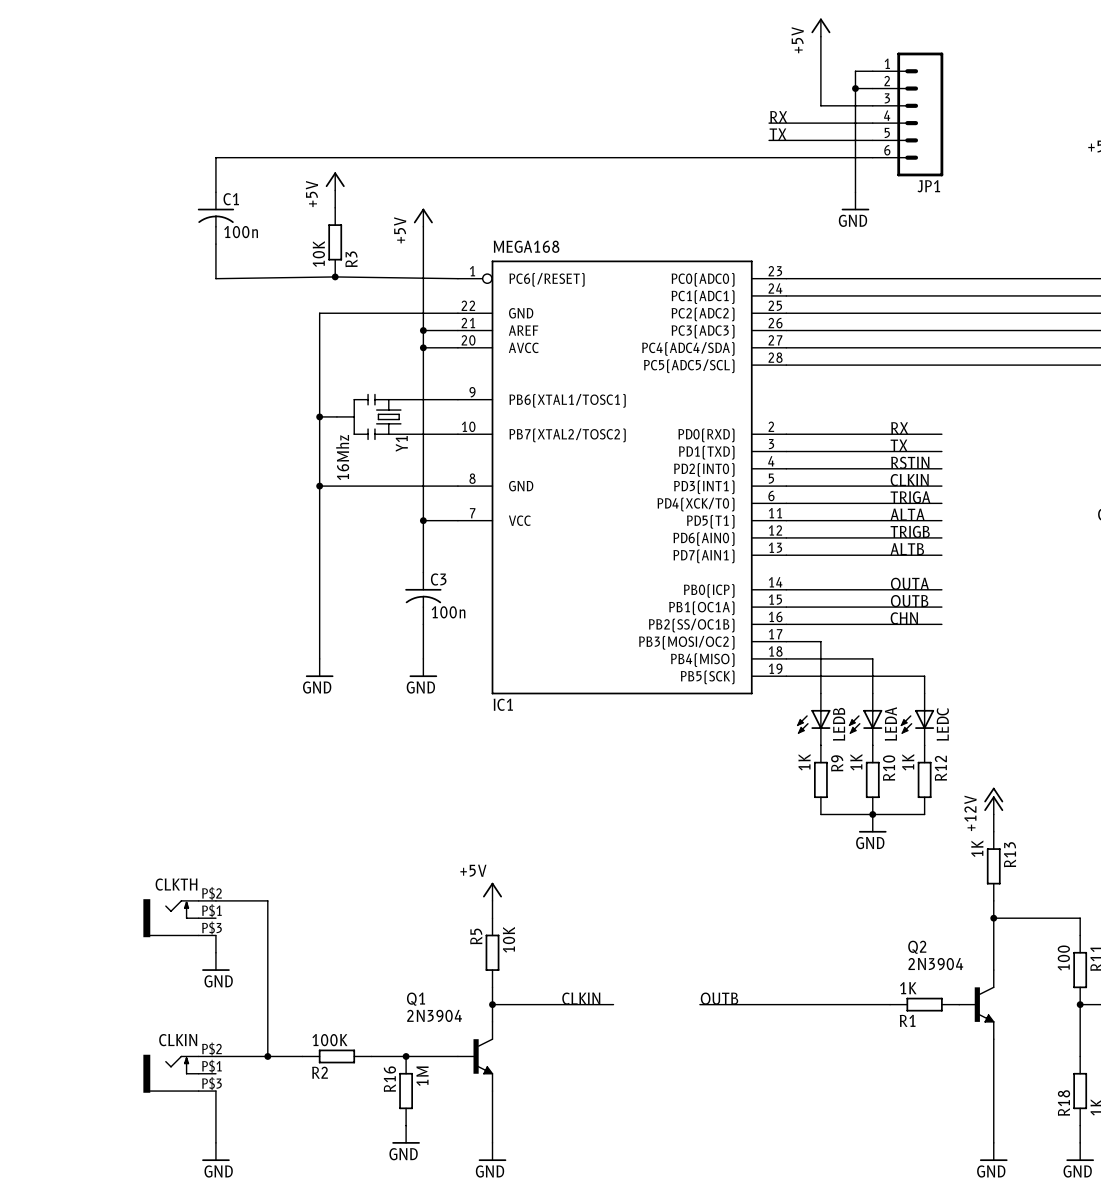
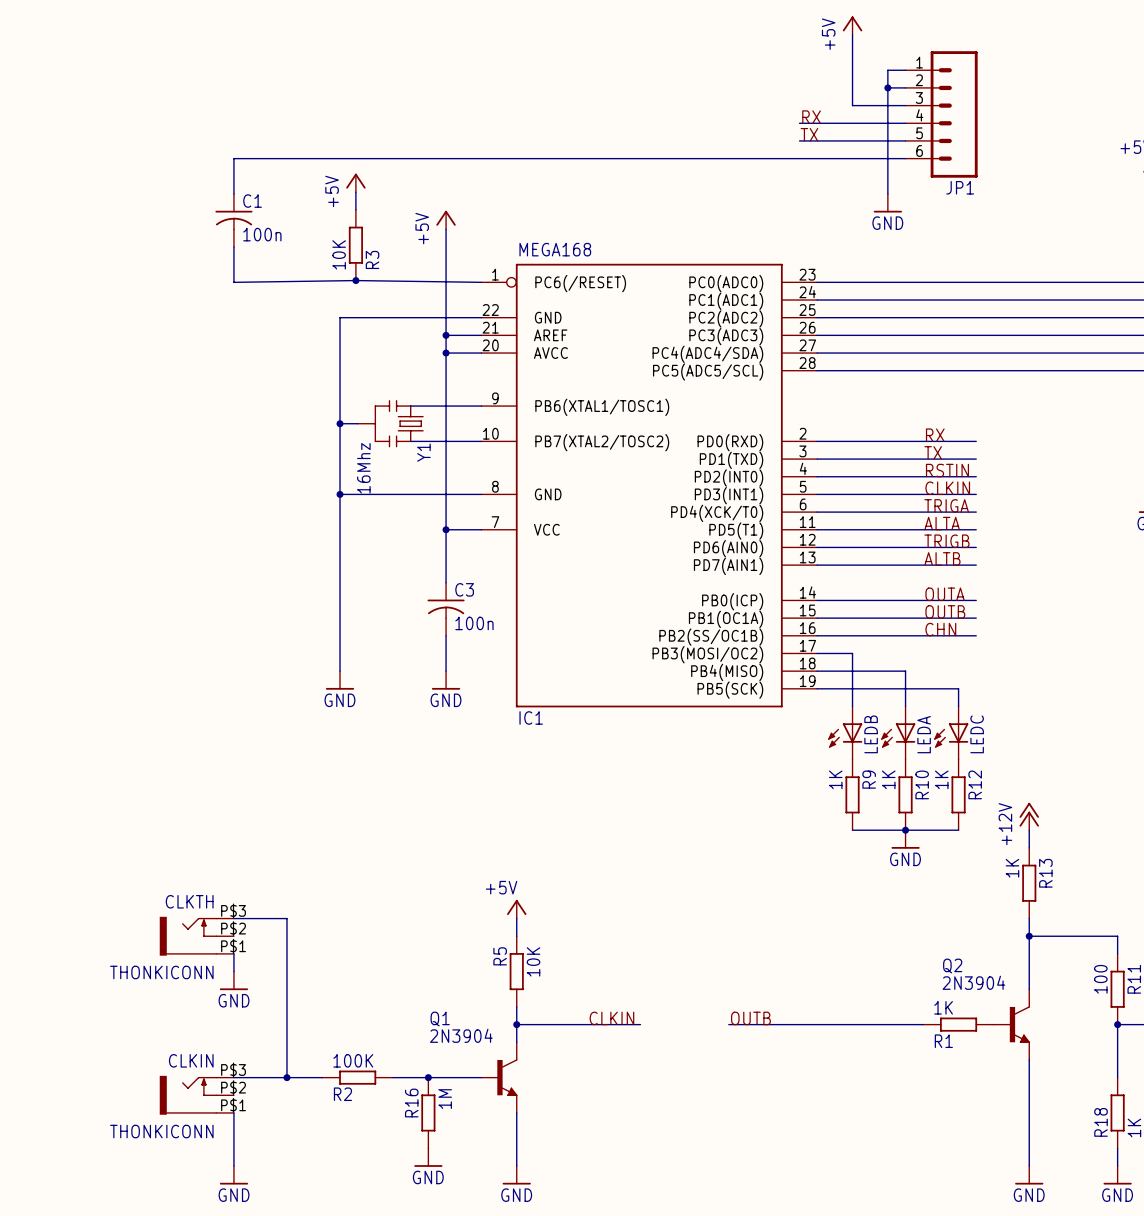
CLKTH pin number: P$2 (211, 893) -> P$3 (233, 910)
CLKTH pin number: P$1 (211, 910) -> P$2 (233, 928)
CLKTH pin number: P$3 (211, 927) -> P$1 (233, 946)
CLKTH value: none -> THONKICONN (161, 972)
CLKIN pin number: P$2 (211, 1048) -> P$3 (233, 1069)
CLKIN pin number: P$1 (211, 1066) -> P$2 (233, 1087)
CLKIN pin number: P$3 (211, 1083) -> P$1 (233, 1105)
CLKIN value: none -> THONKICONN (161, 1131)

